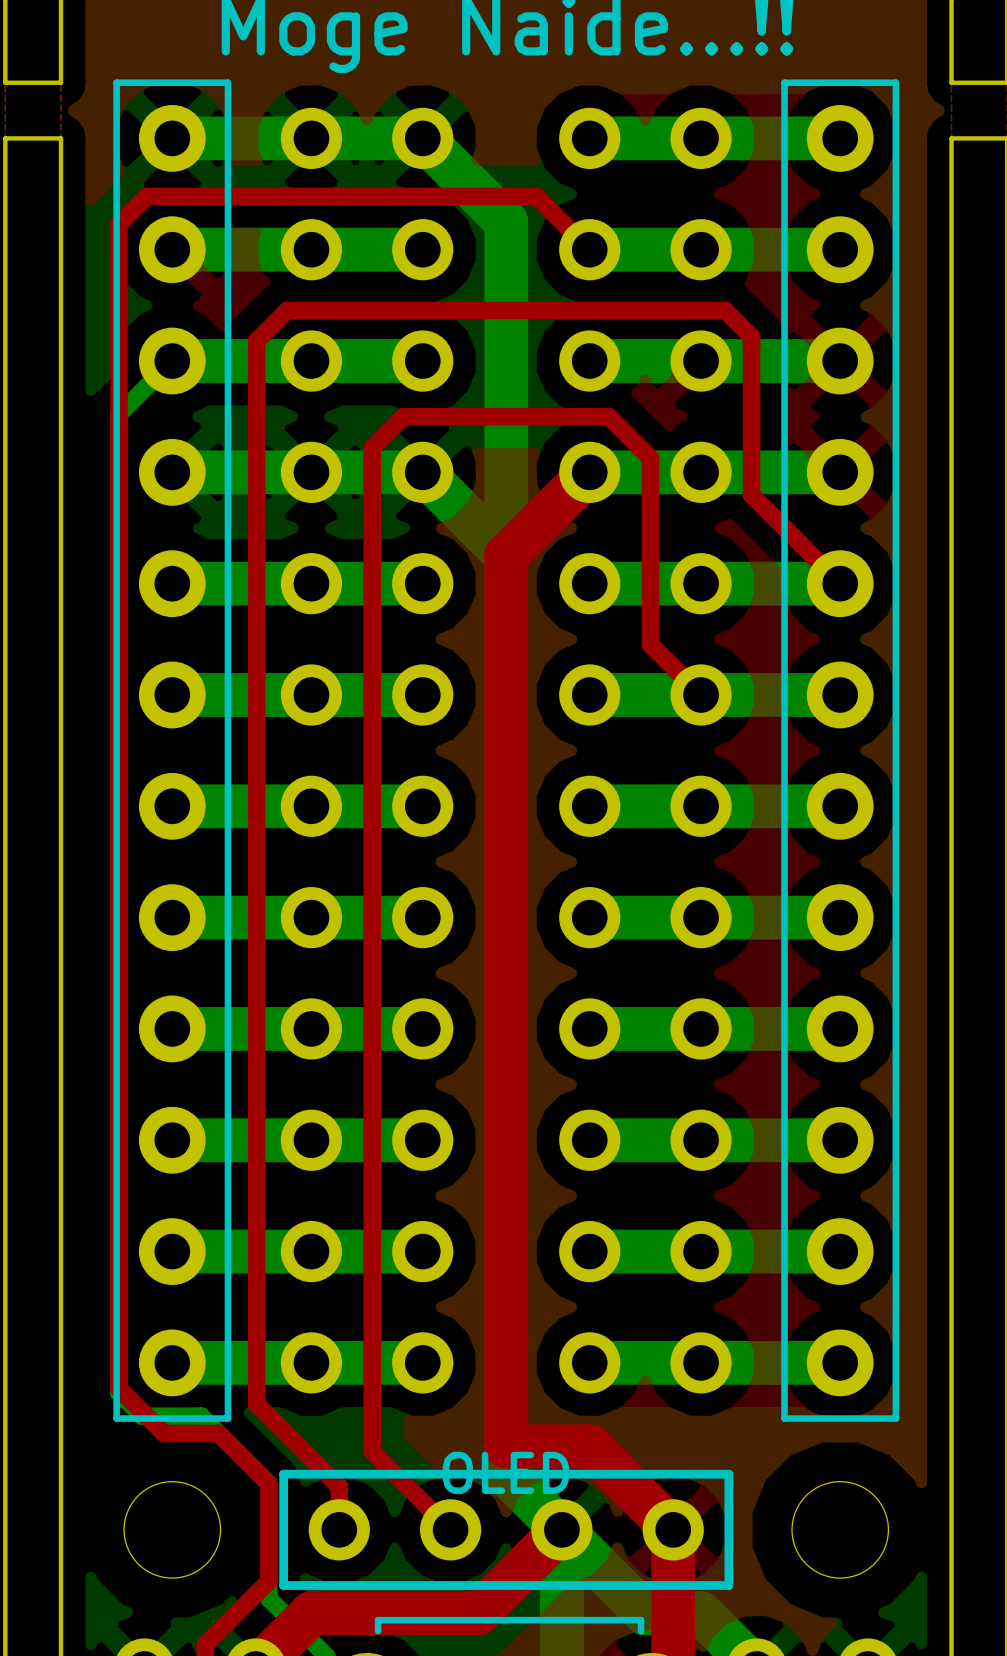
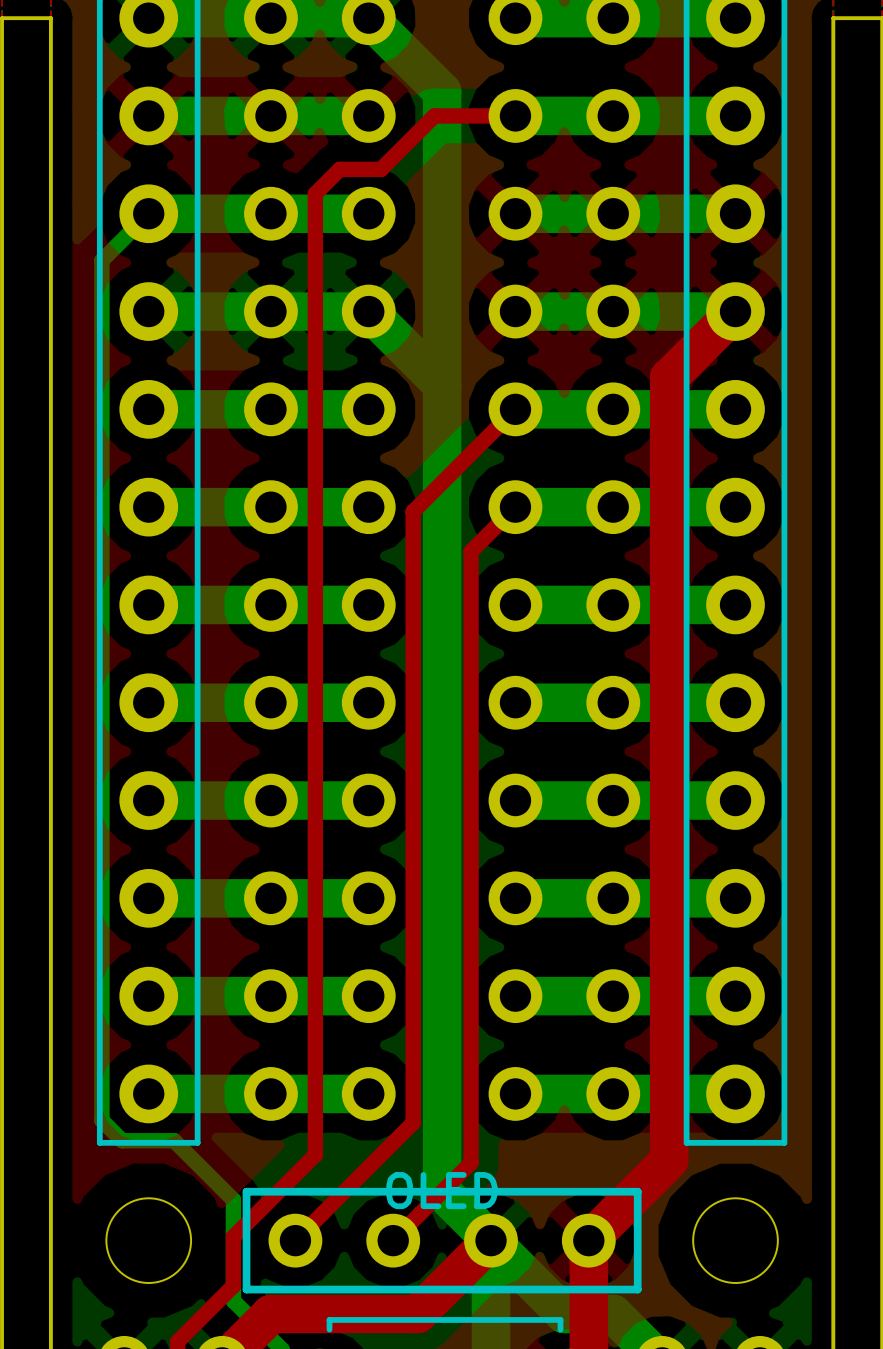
top track: (589, 249) (536, 196) (146, 196) (119, 224) (119, 1388) (163, 1433) (218, 1433) (268, 1483) (268, 1525) -> none
top track: (389, 310) (287, 310) (256, 341) (256, 1403) (339, 1486) (339, 1529) -> (339, 169) (315, 193) (315, 1155) (233, 1236)
top track: (436, 310) (725, 310) (751, 336) (751, 495) (840, 583) -> (381, 169) (434, 115) (515, 115)
top track: (589, 472) (506, 555) (506, 1446) (589, 1446) (673, 1529) -> (735, 311) (669, 377) (669, 1160) (588, 1240)
top track: none -> (515, 409) (413, 511) (413, 1122) (295, 1240)
top track: (701, 694) (650, 644) (650, 458) (608, 416) (403, 416) (372, 448) (372, 1451) (450, 1529) -> (515, 507) (471, 551) (471, 1162) (393, 1240)

